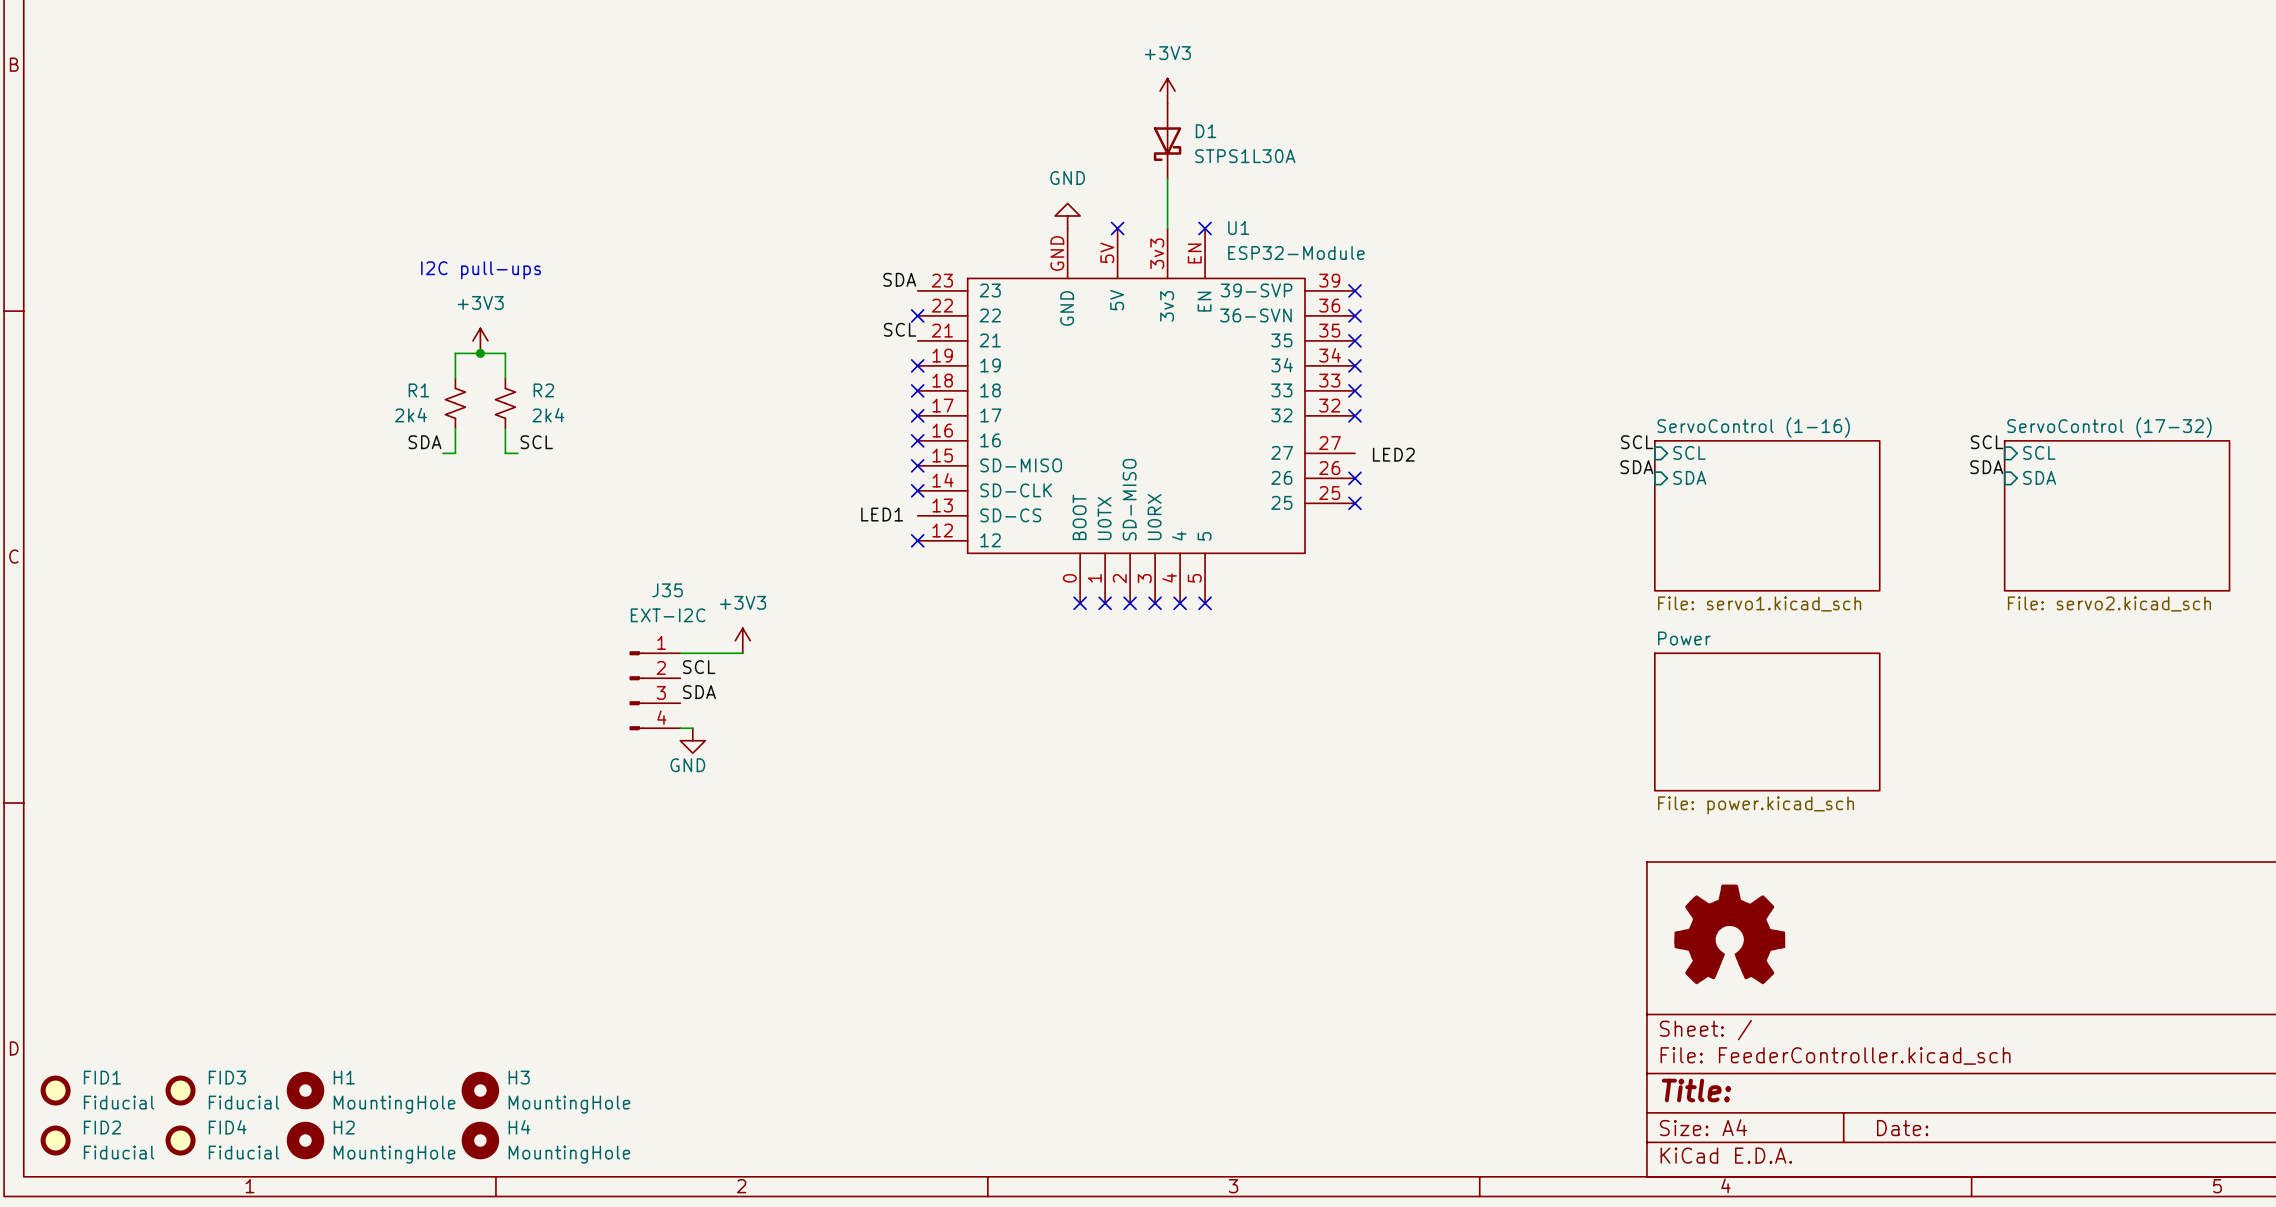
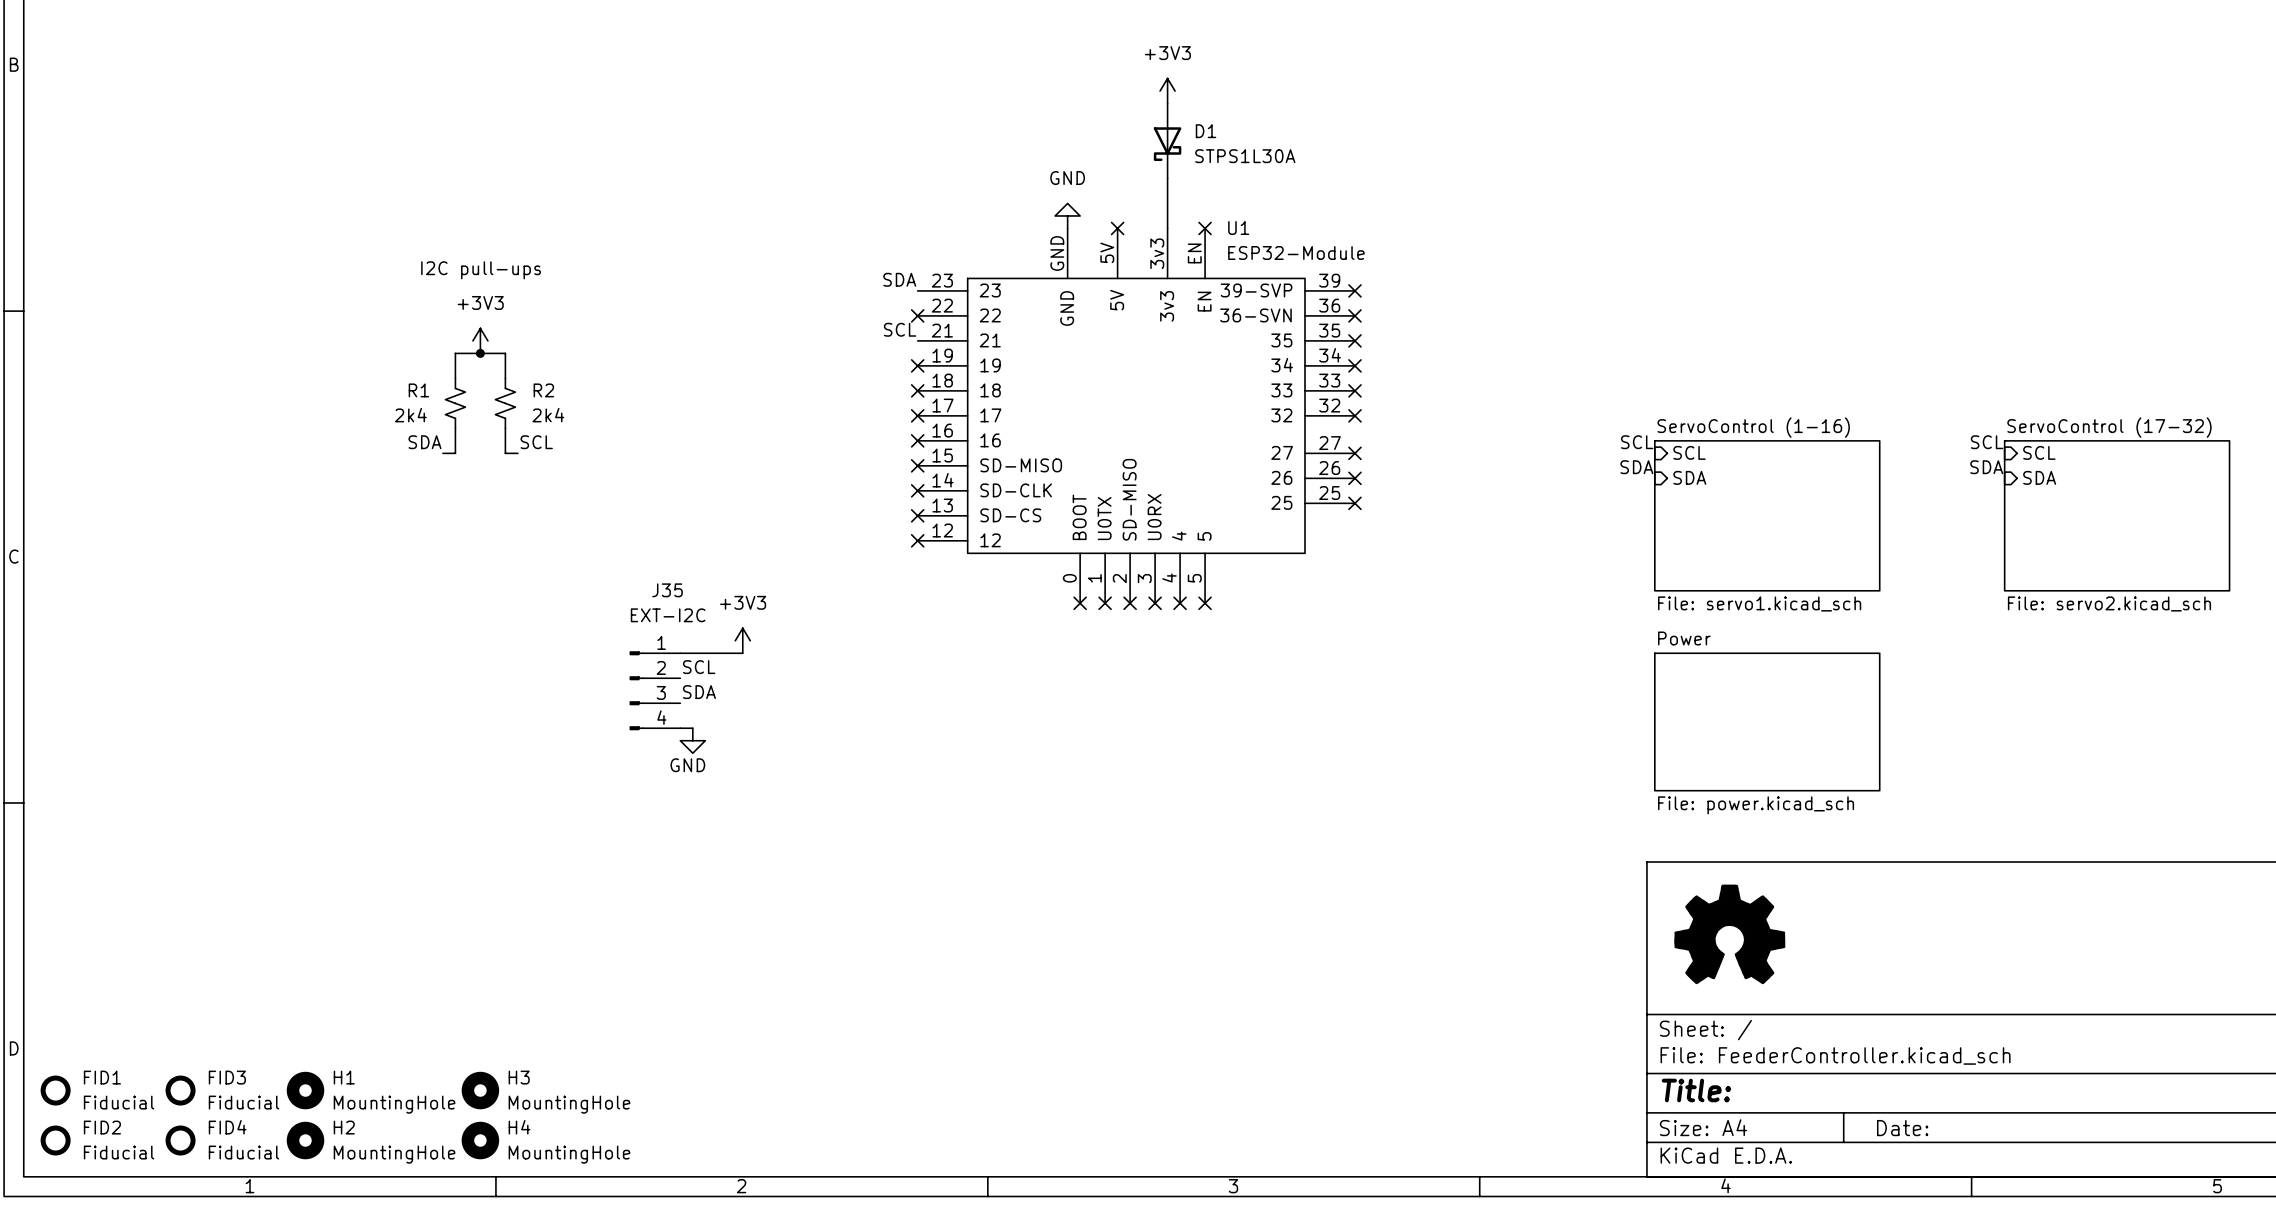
no-connect mark: none -> (1354, 453)
label: LED2 (1393, 454) -> none
label: LED1 (882, 514) -> none
no-connect mark: none -> (917, 515)

